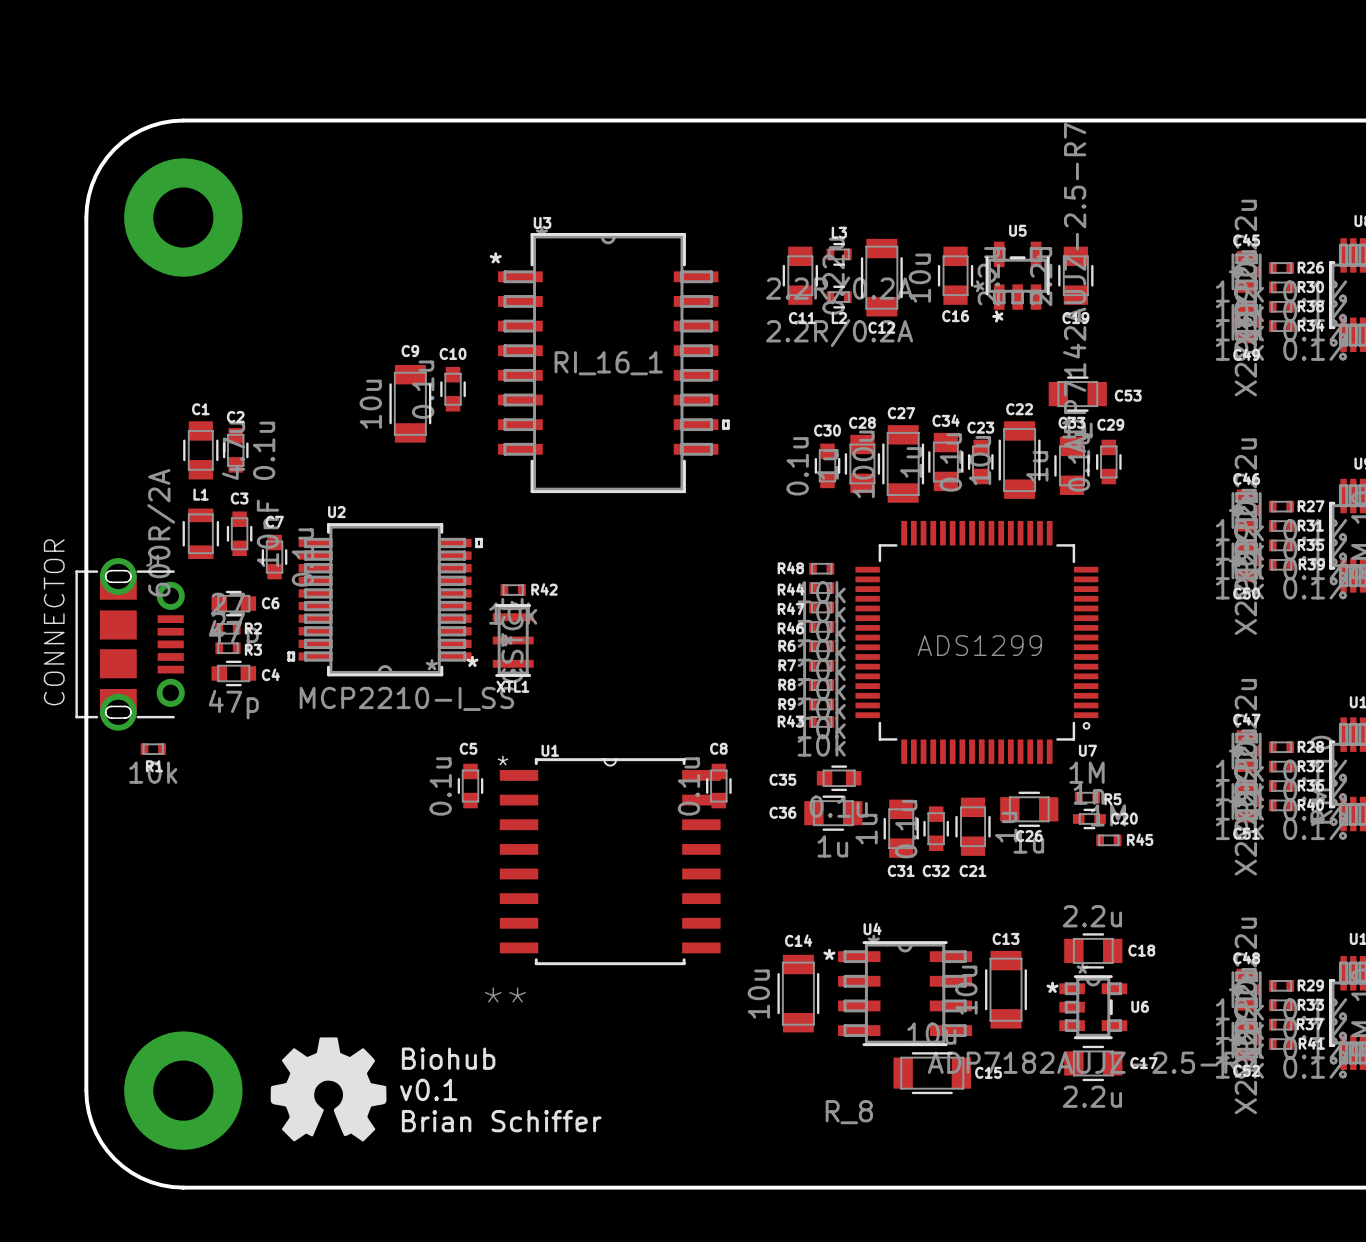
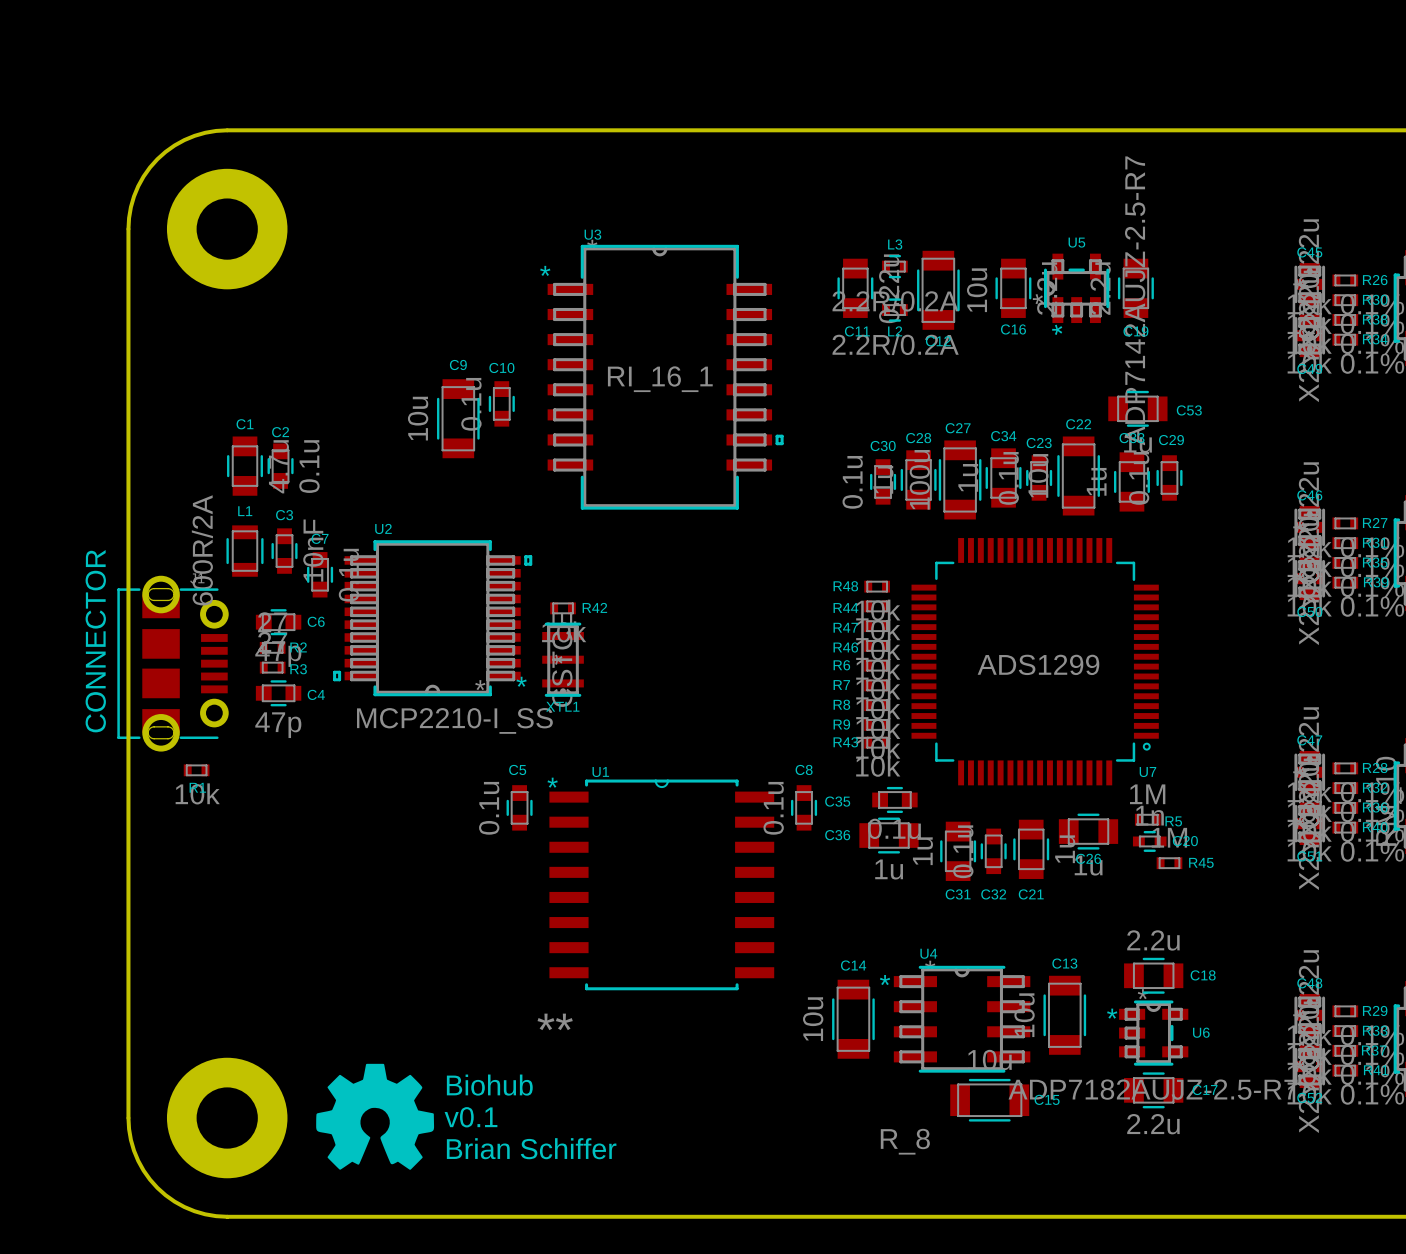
C8 position: (718, 786) -> (804, 807)

